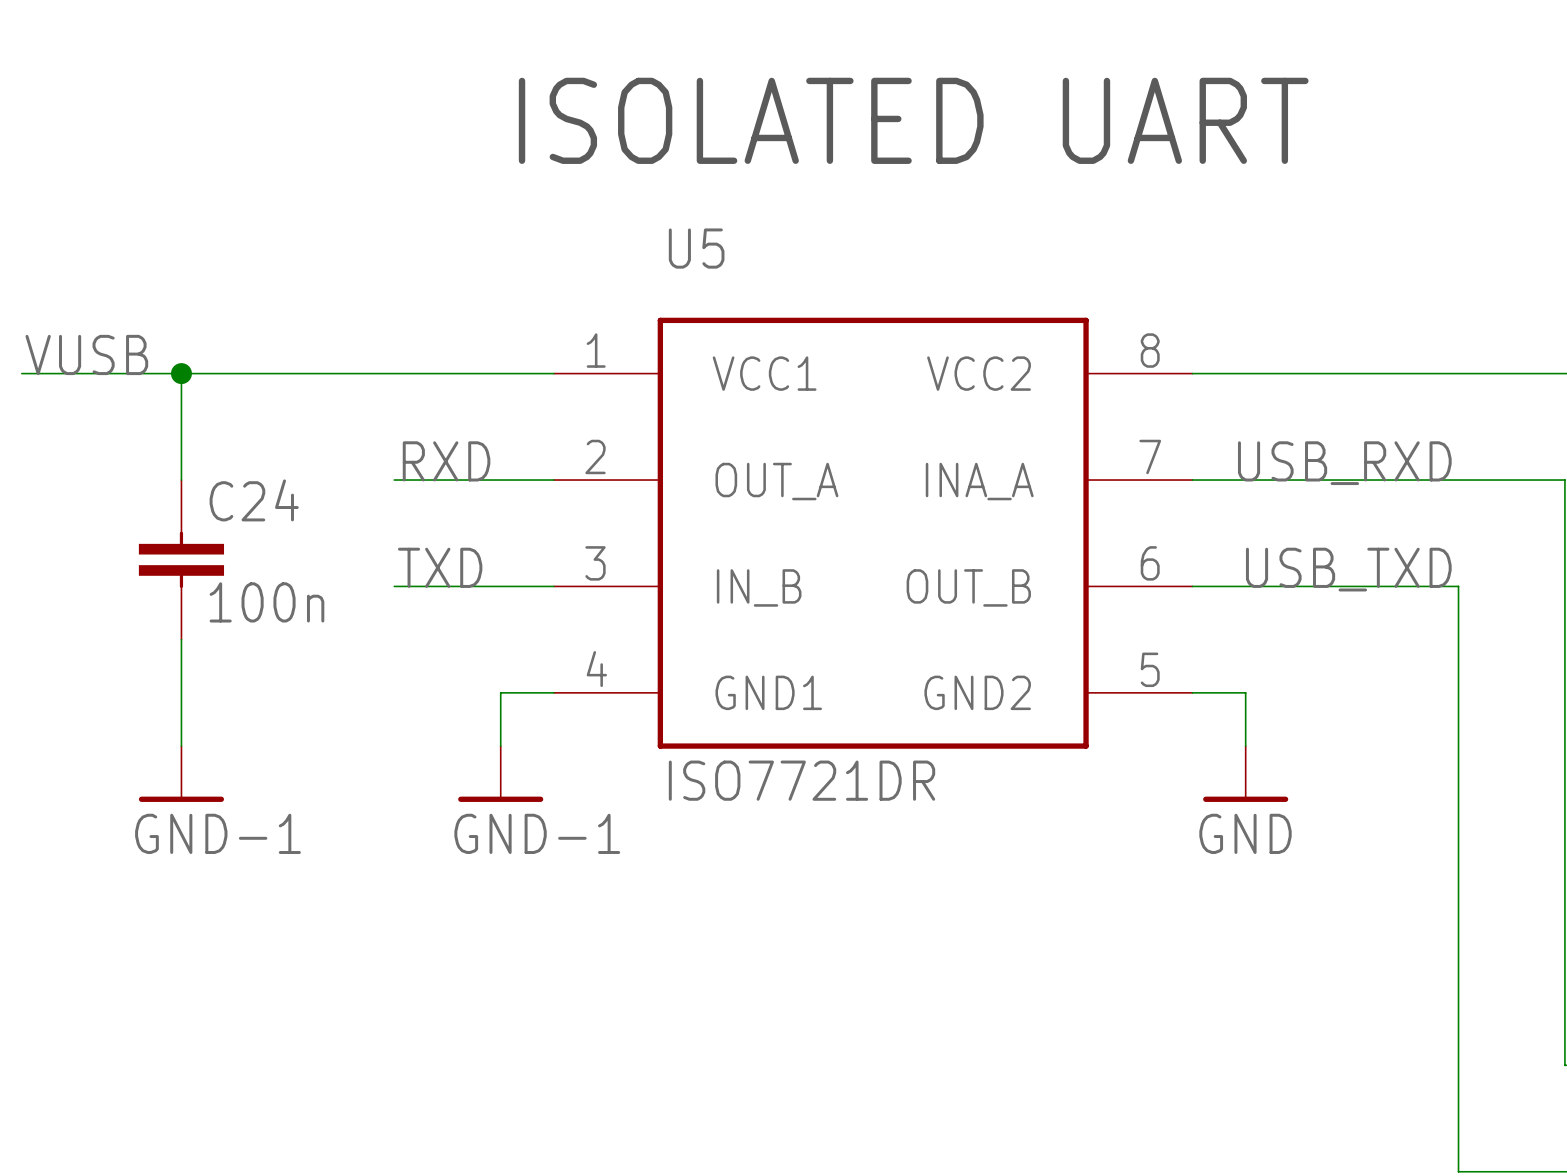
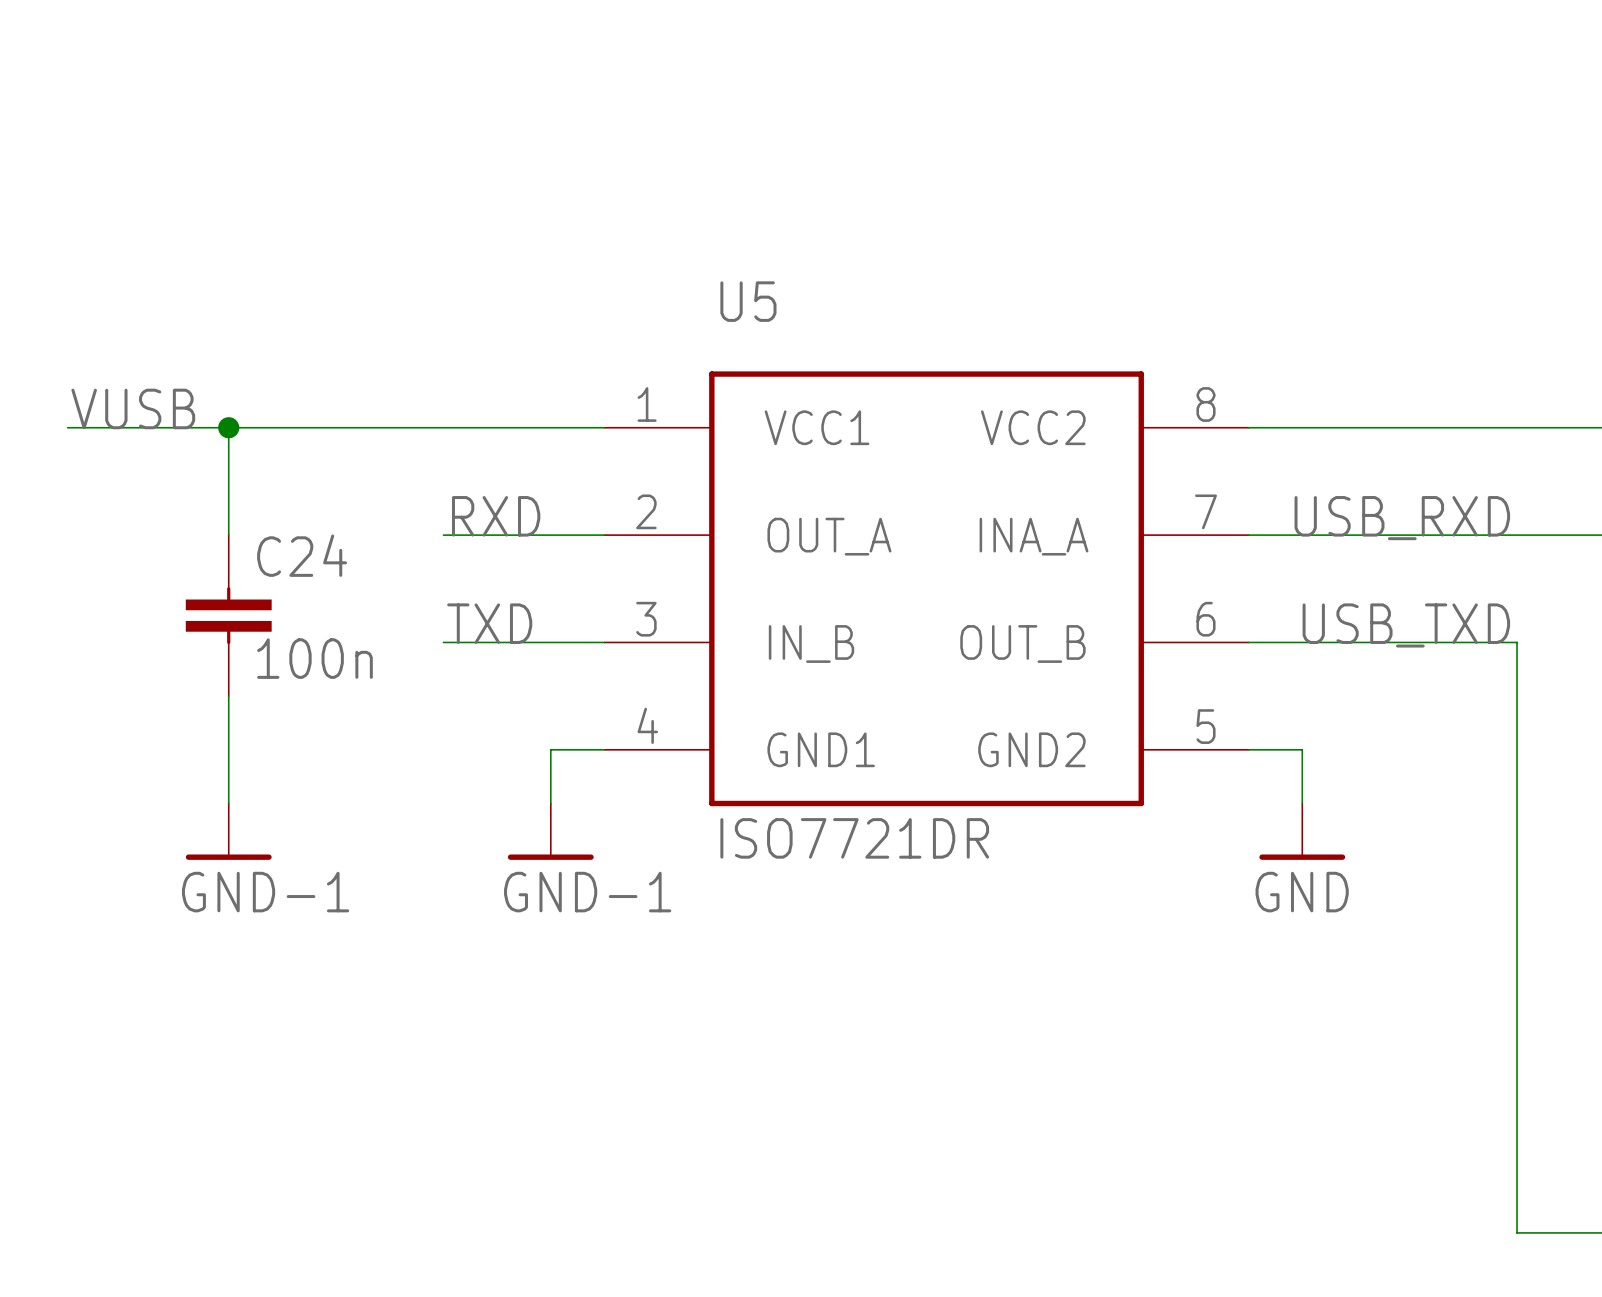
text: ISOLATED UART (913, 120) -> none

